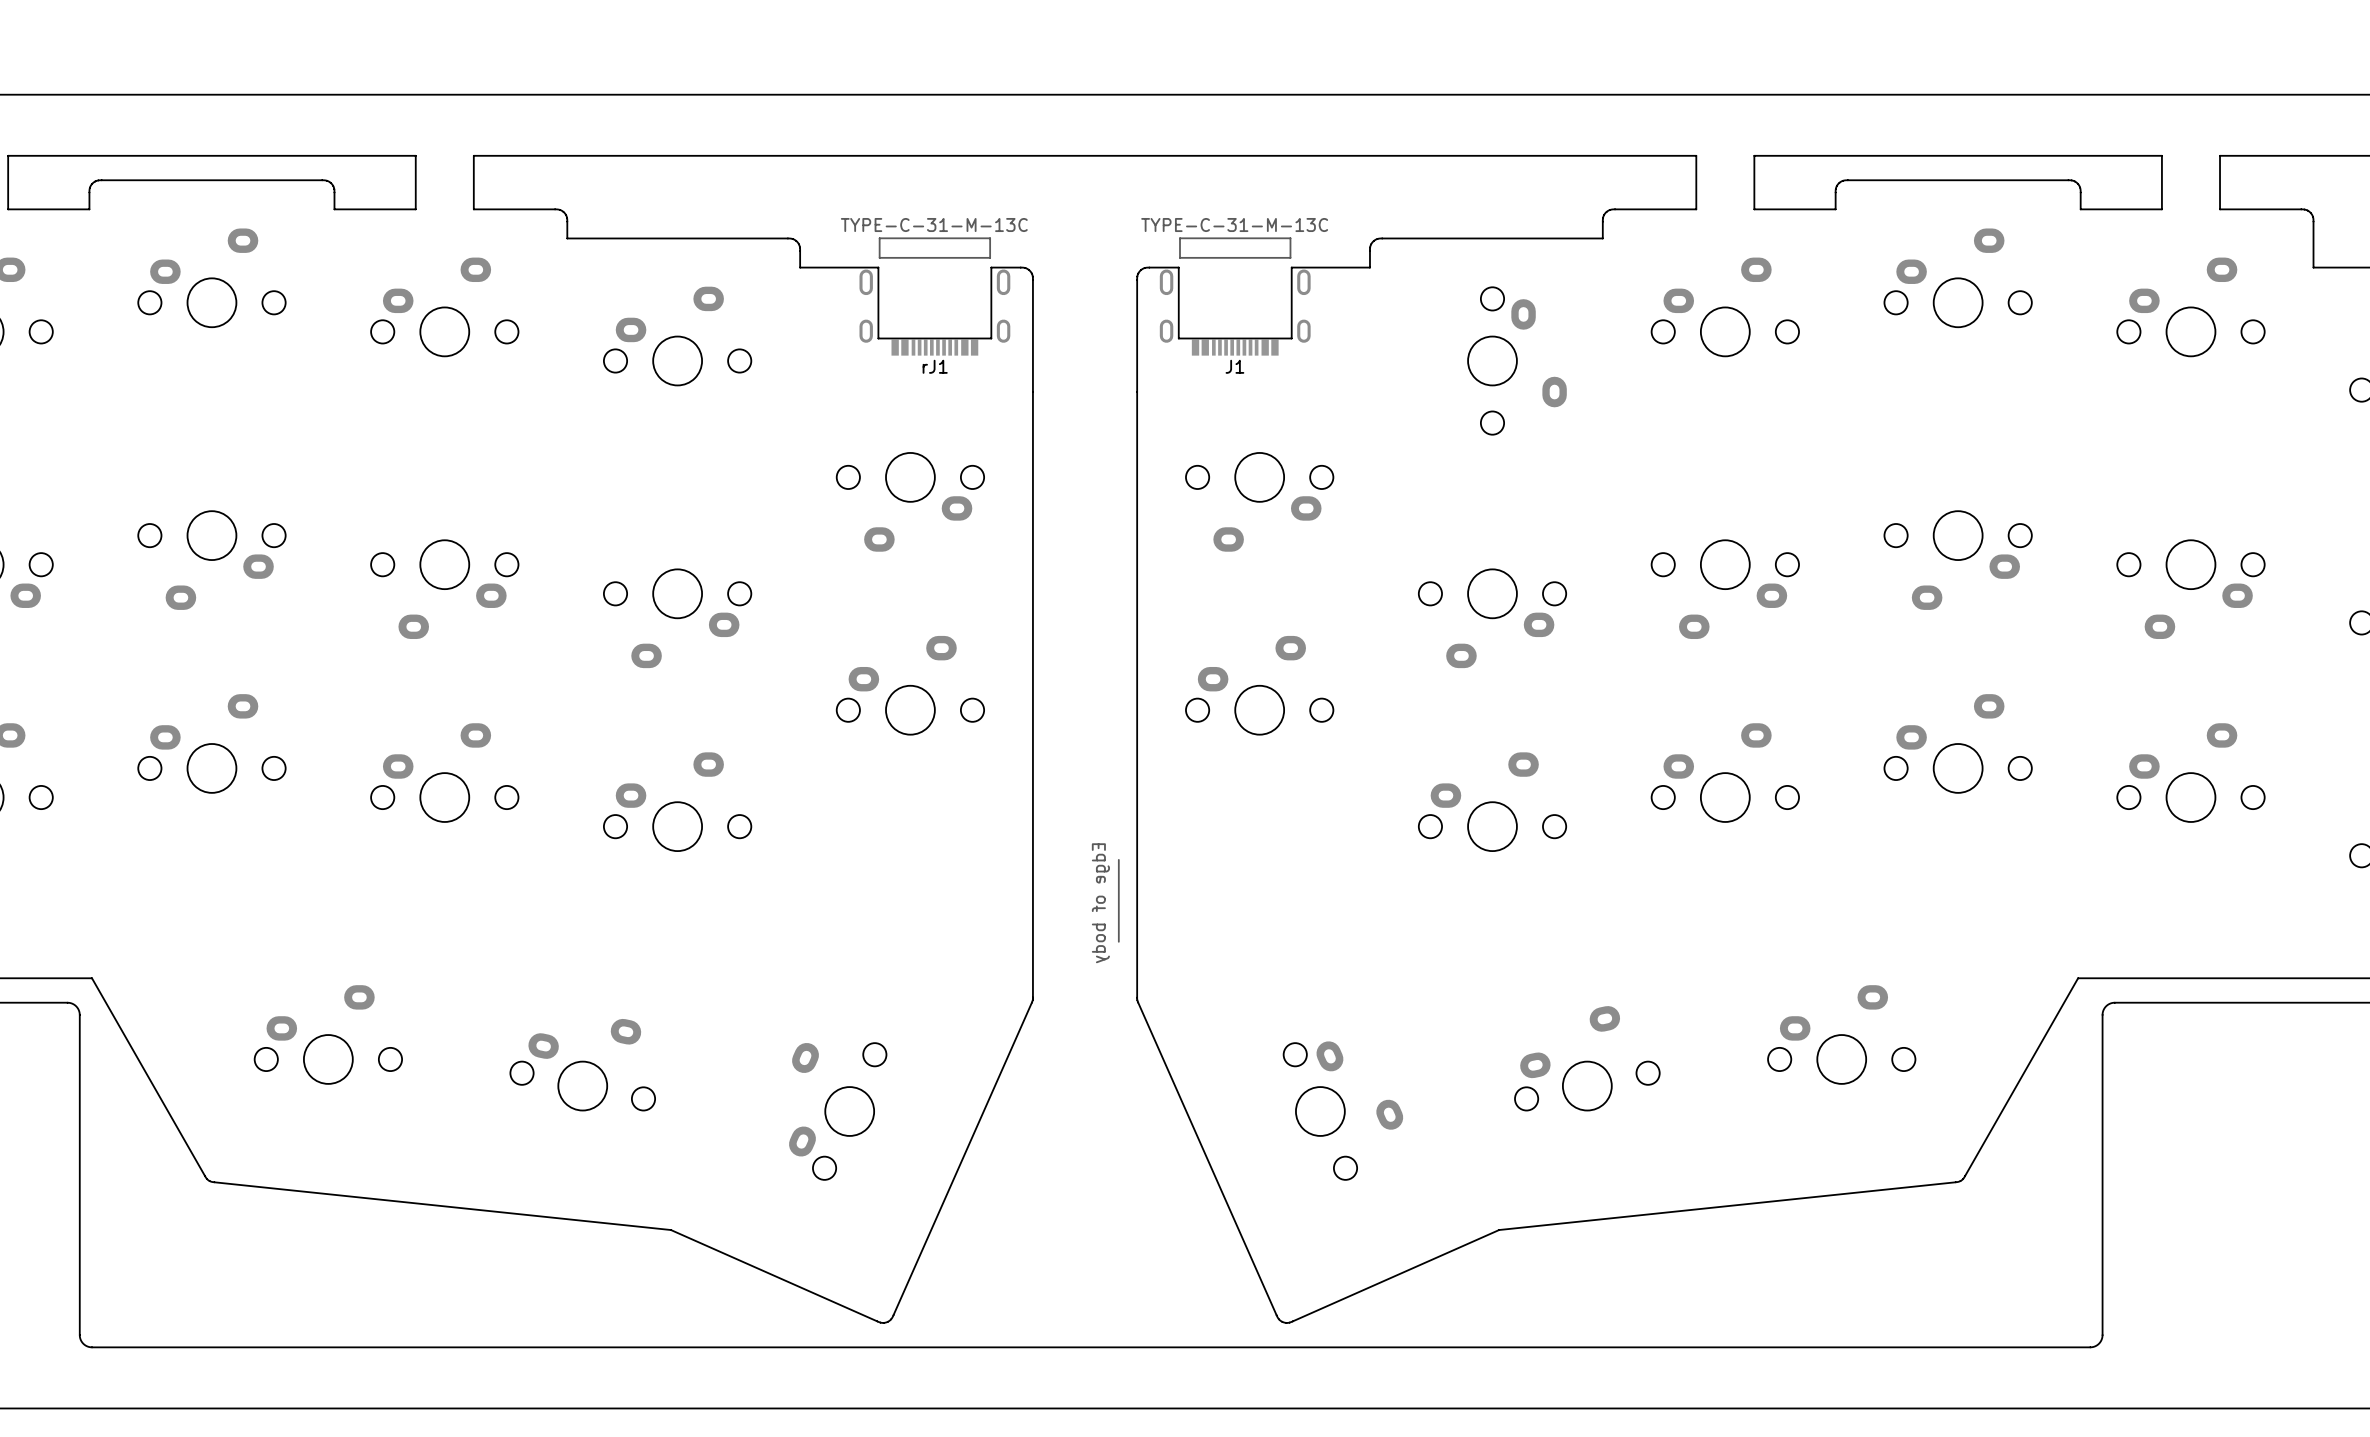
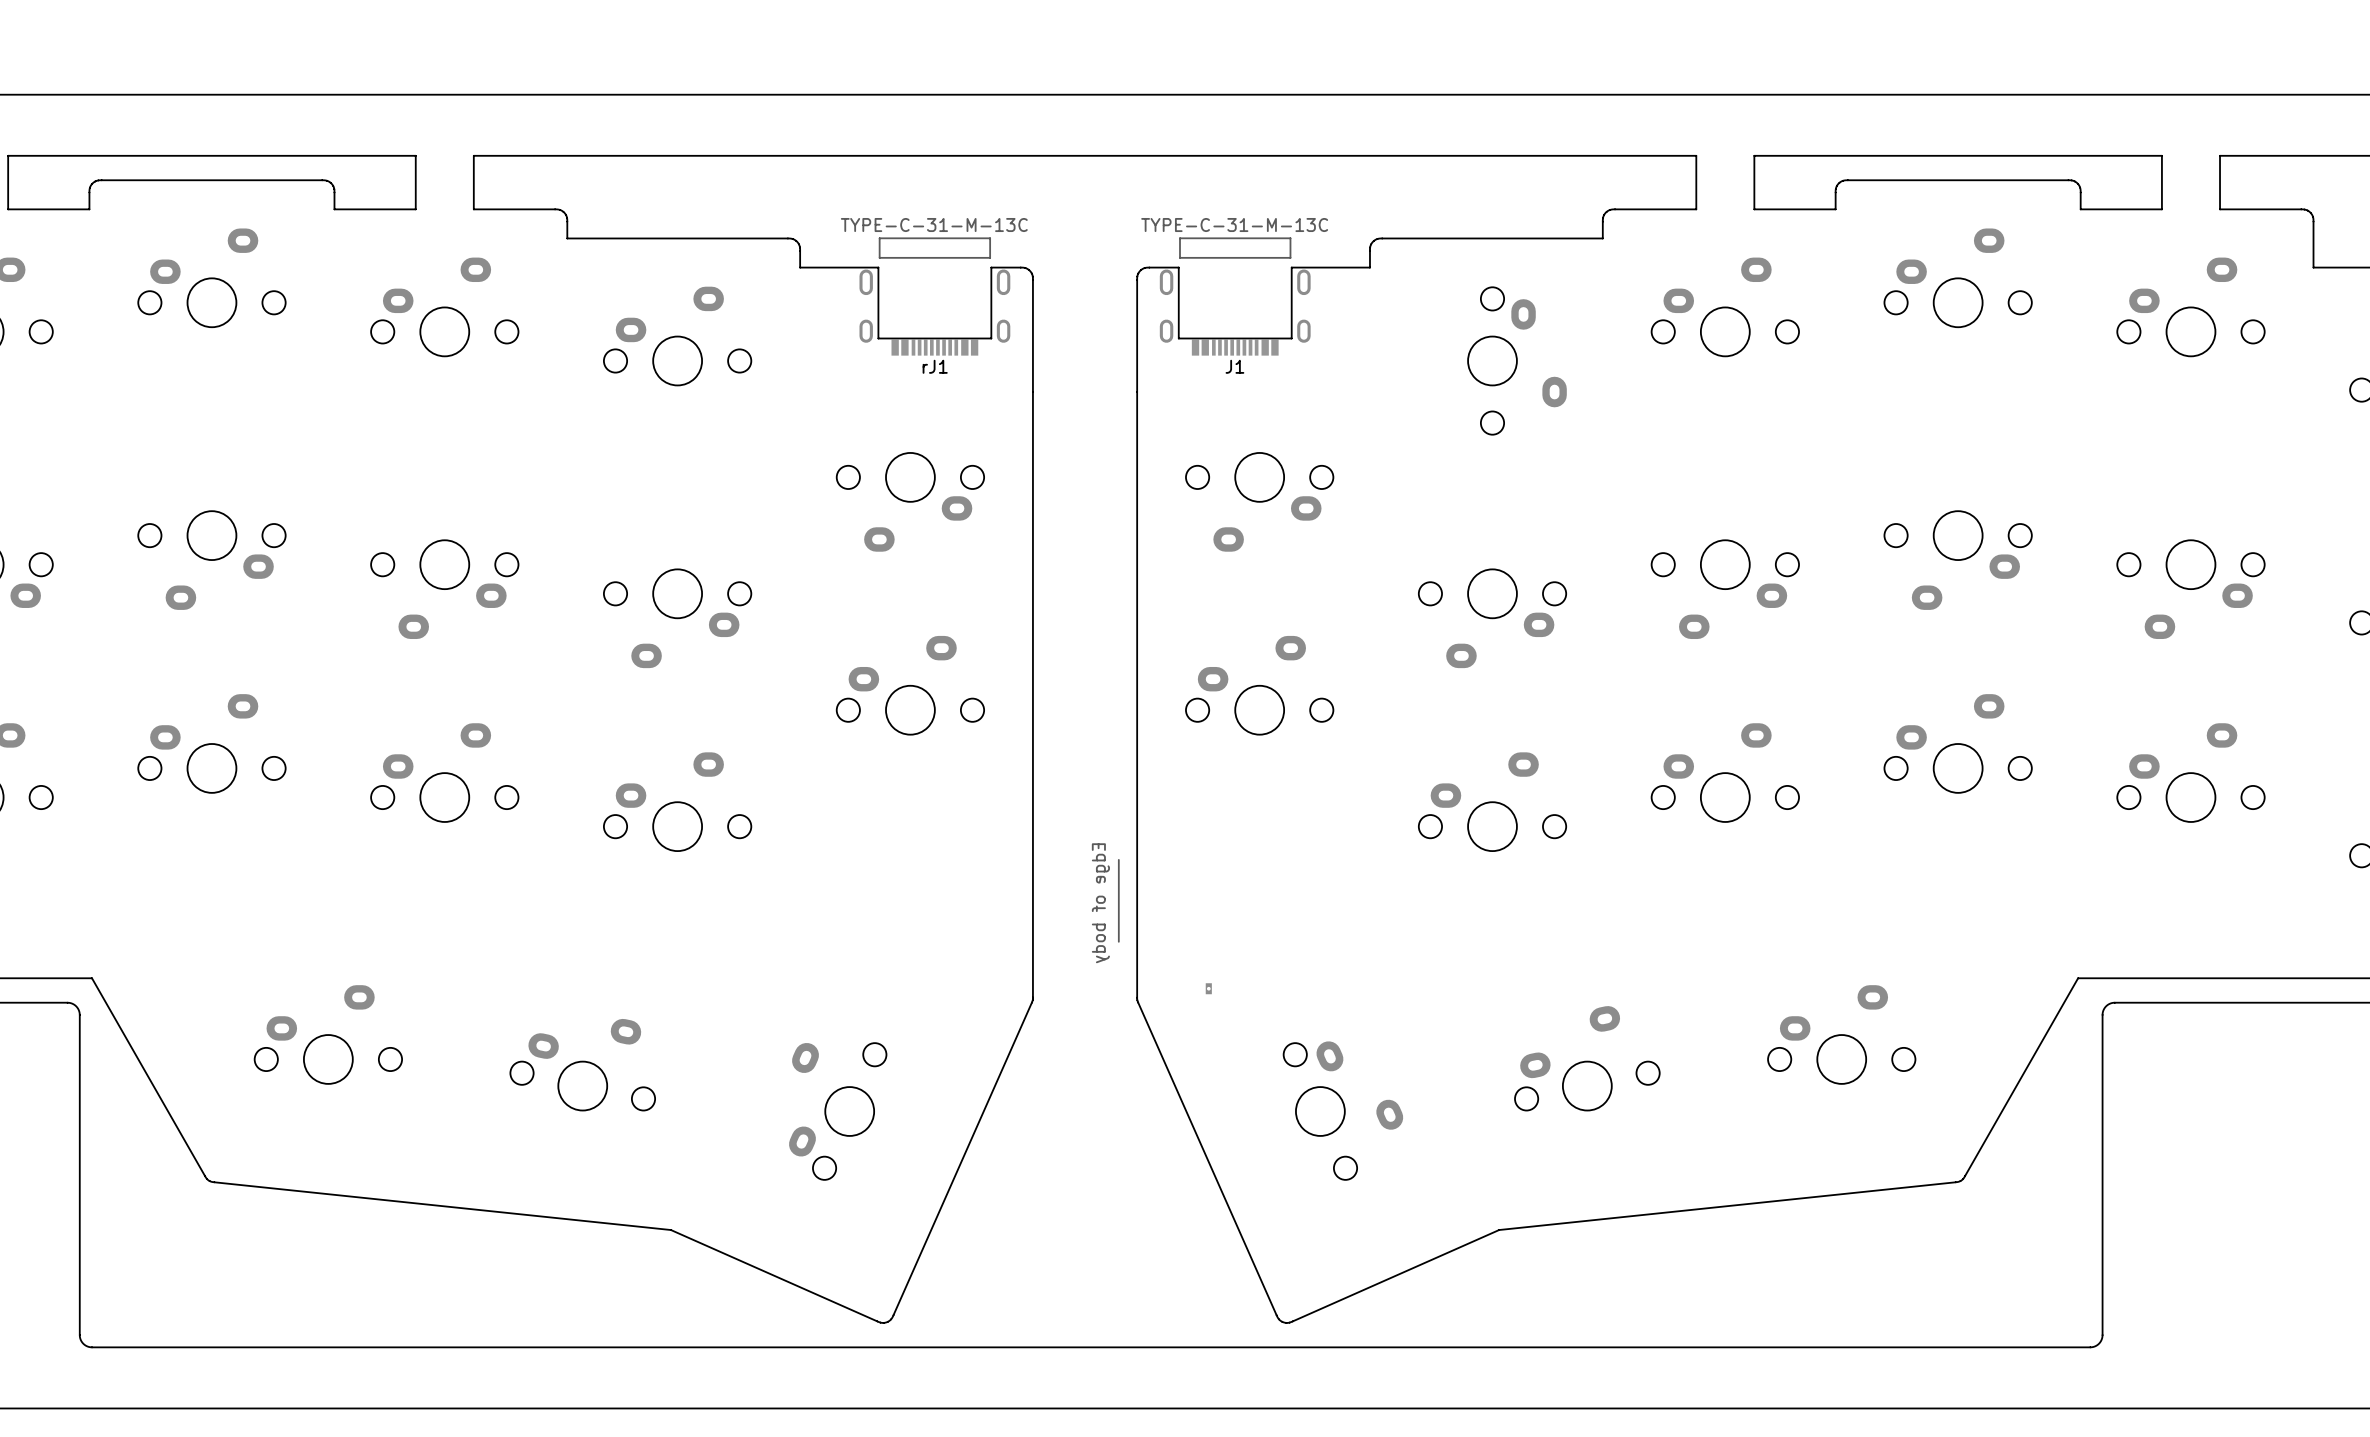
part: none -> (1208, 988)

